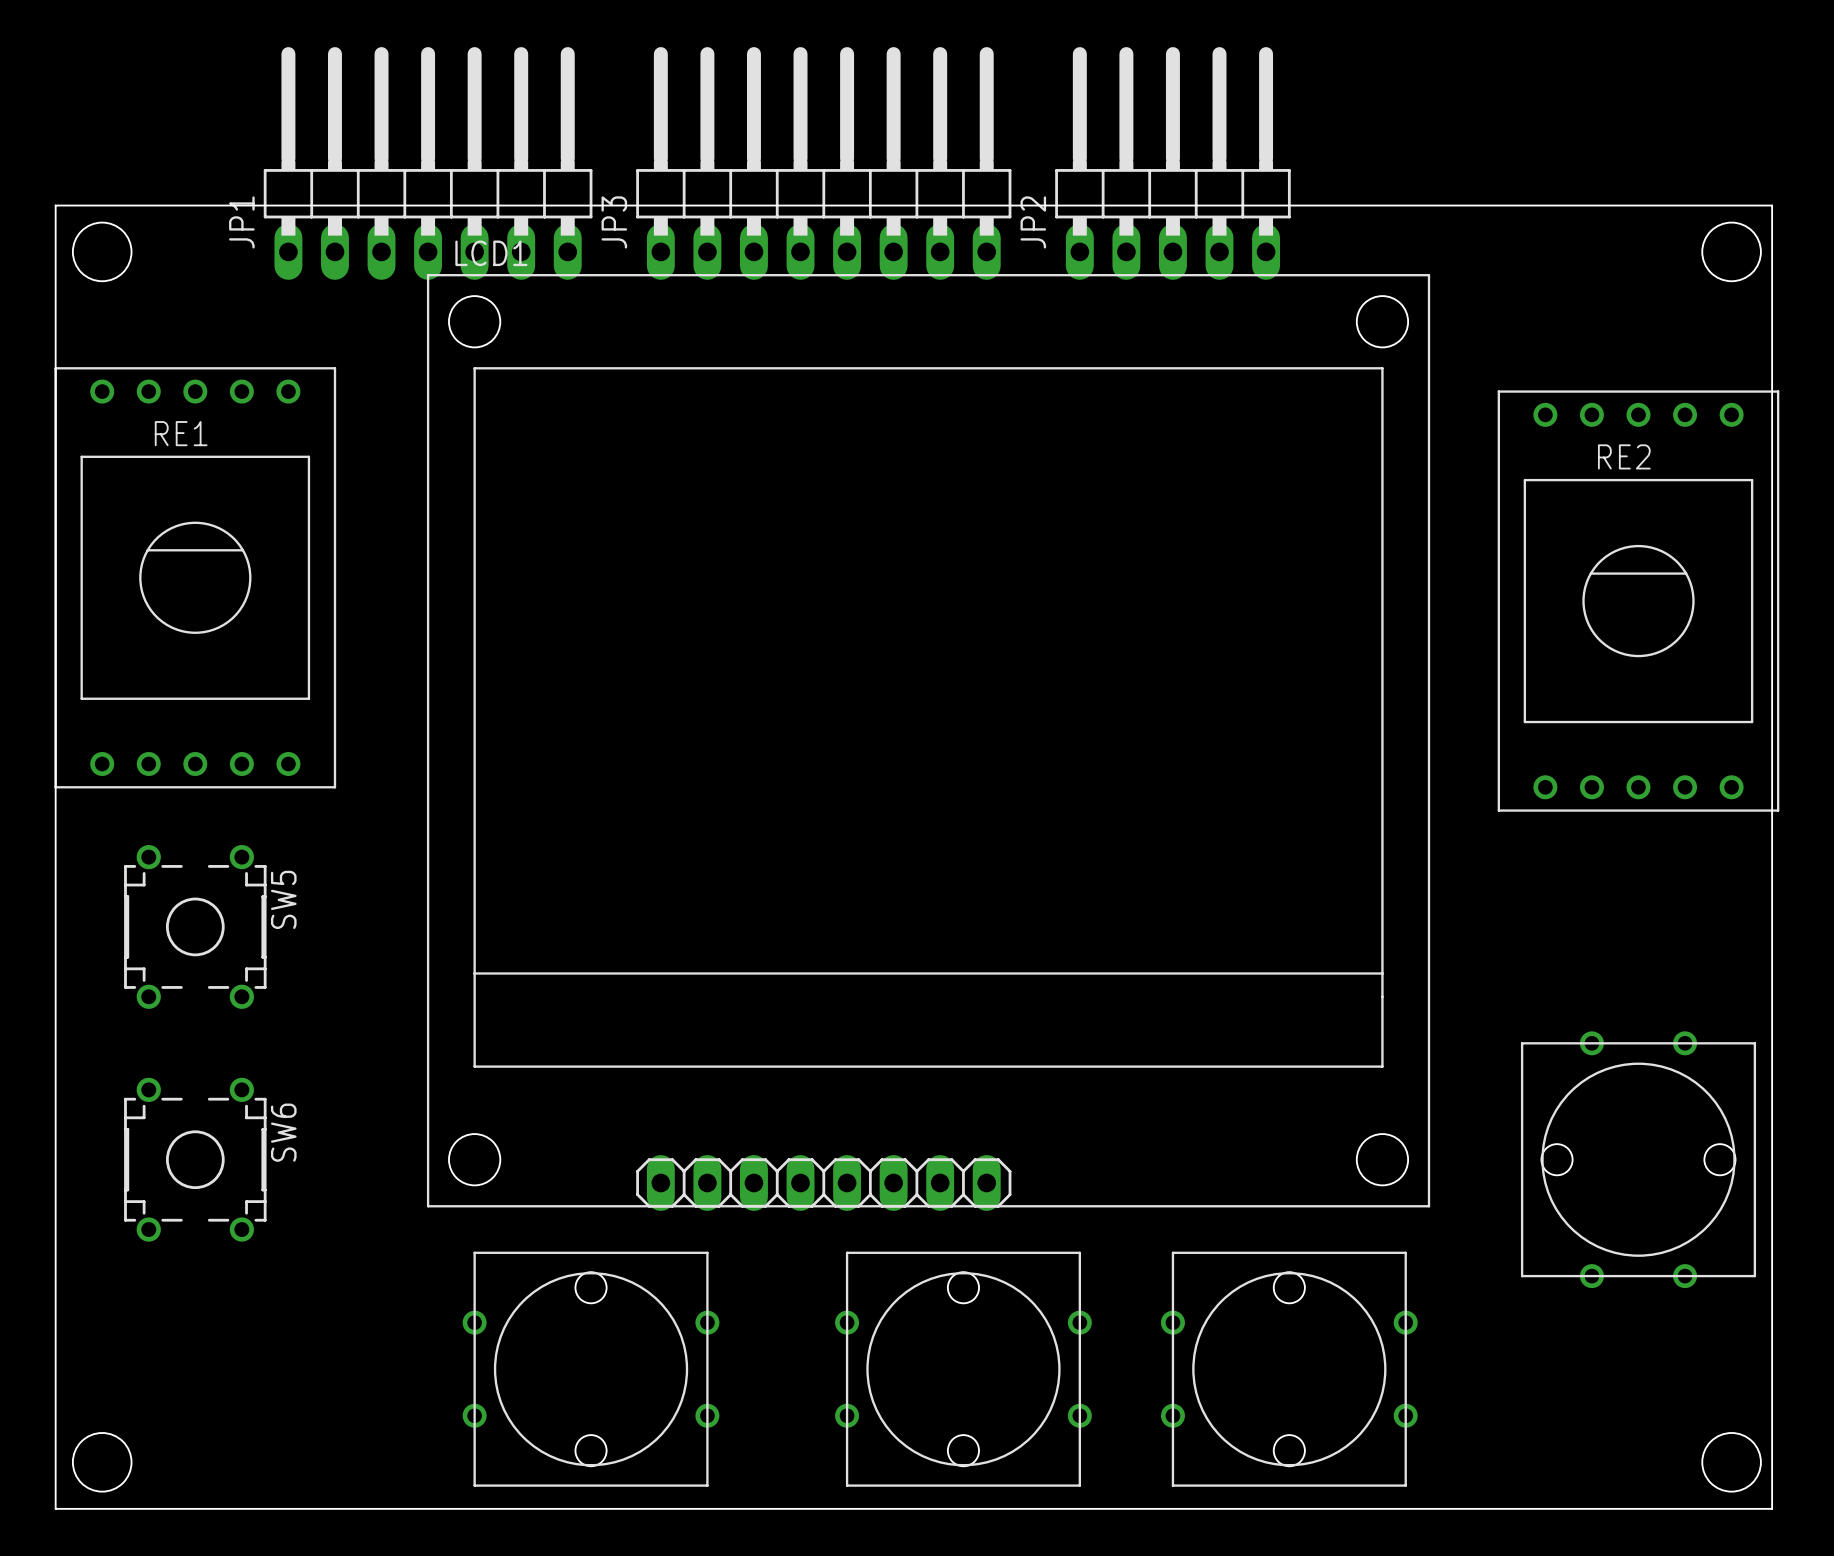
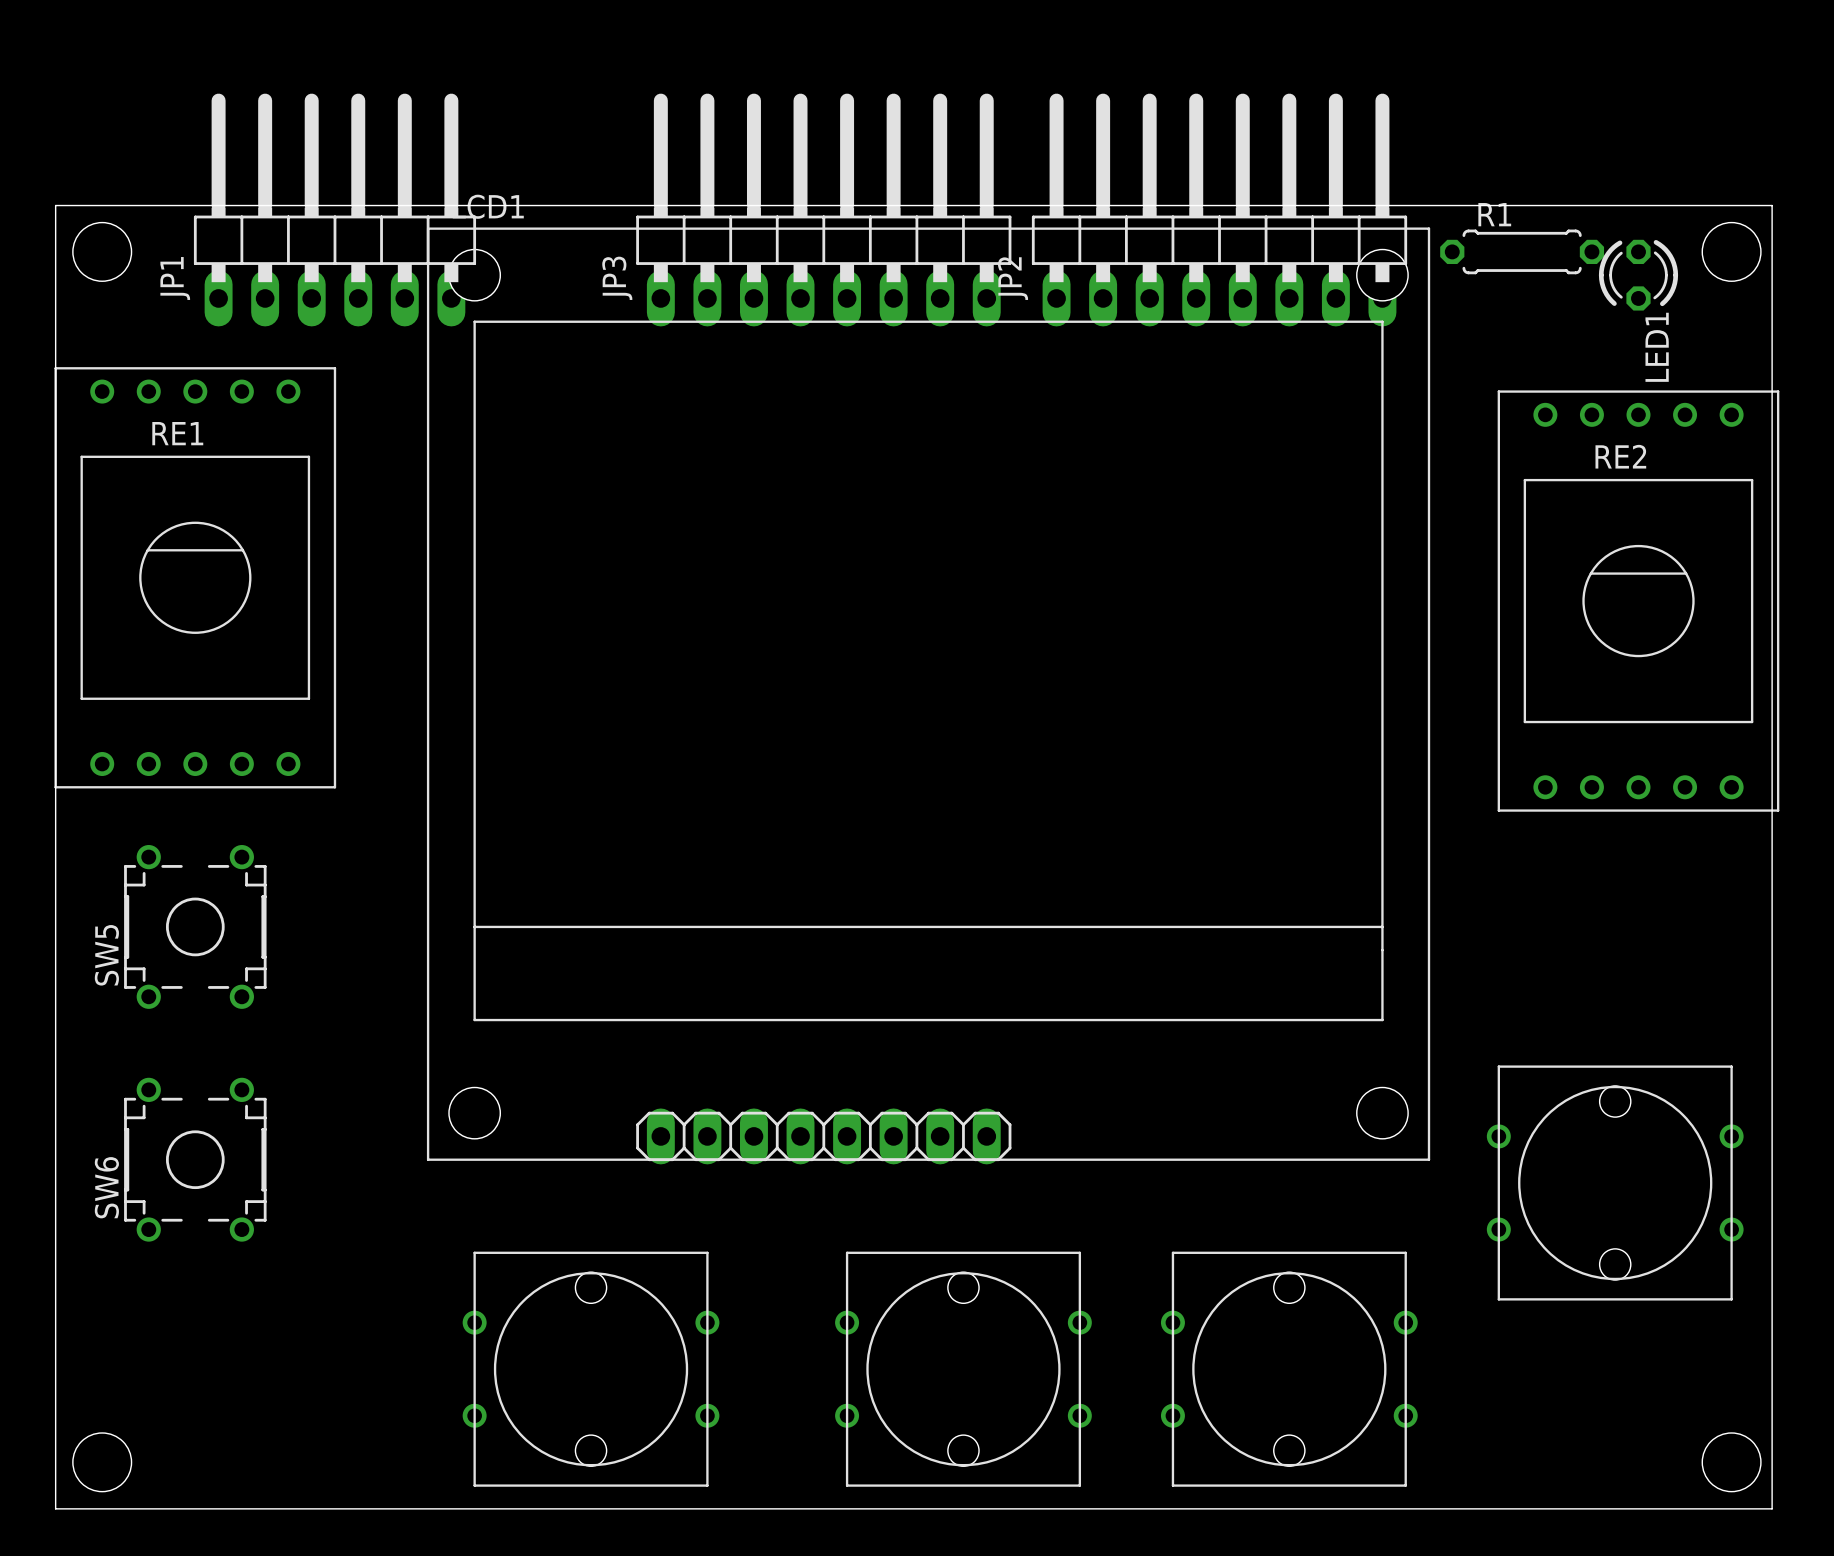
JP1 footprint: [263, 47, 593, 280] -> [193, 93, 477, 327]
JP2 footprint: [1055, 47, 1291, 280] -> [1031, 93, 1408, 327]
JP3 position: (823, 163) -> (823, 210)
JP2 name position: JP2 (1033, 222) -> JP2 (1013, 278)
R1: none -> (1522, 251)
LED1: none -> (1638, 275)
LCD1 position: (928, 742) -> (928, 695)
SW5 name position: SW5 (283, 899) -> SW5 (106, 955)
SW6 name position: SW6 (283, 1132) -> SW6 (106, 1187)
part rotation: 0° (1638, 1159) -> 90° clockwise (1615, 1182)

